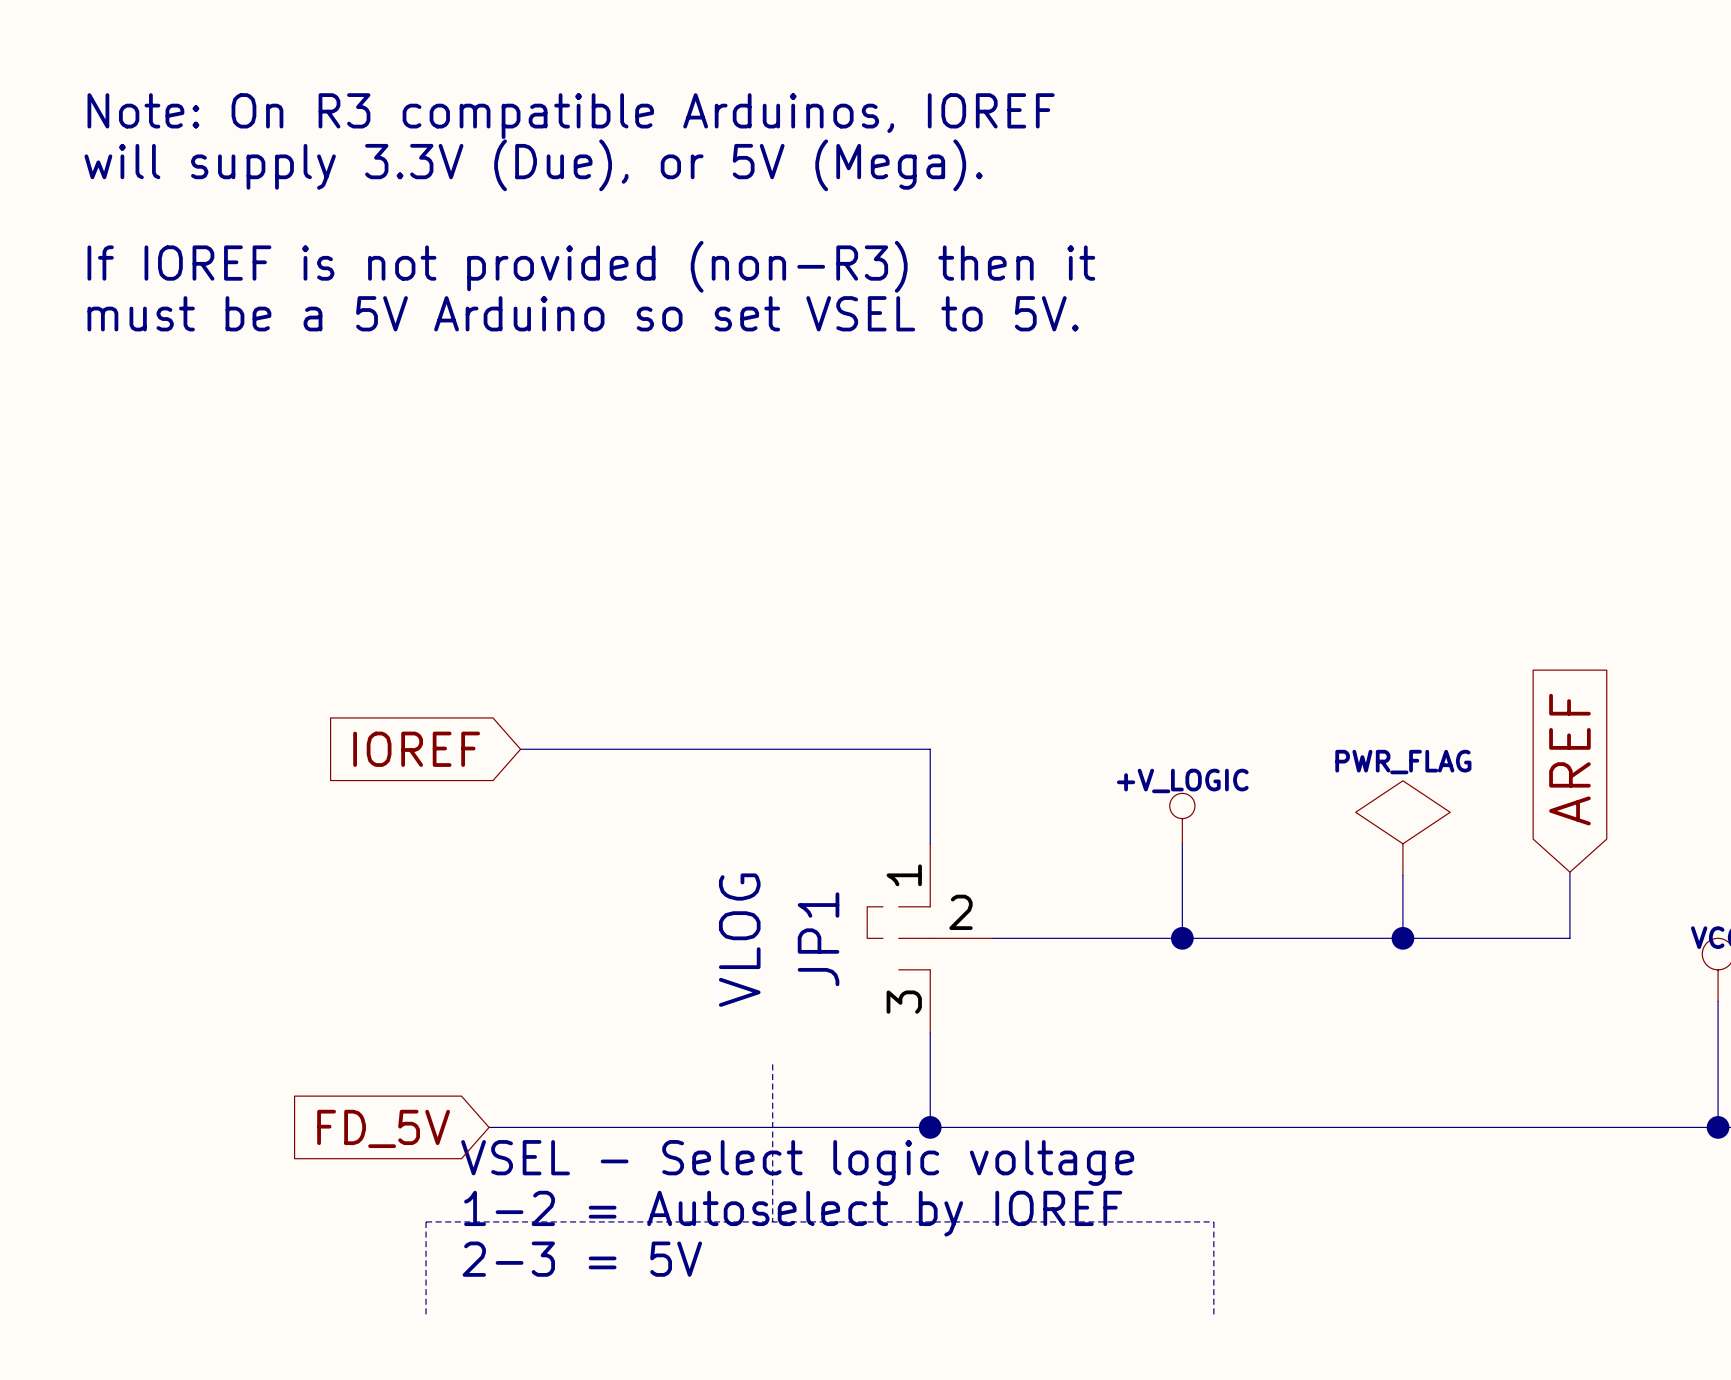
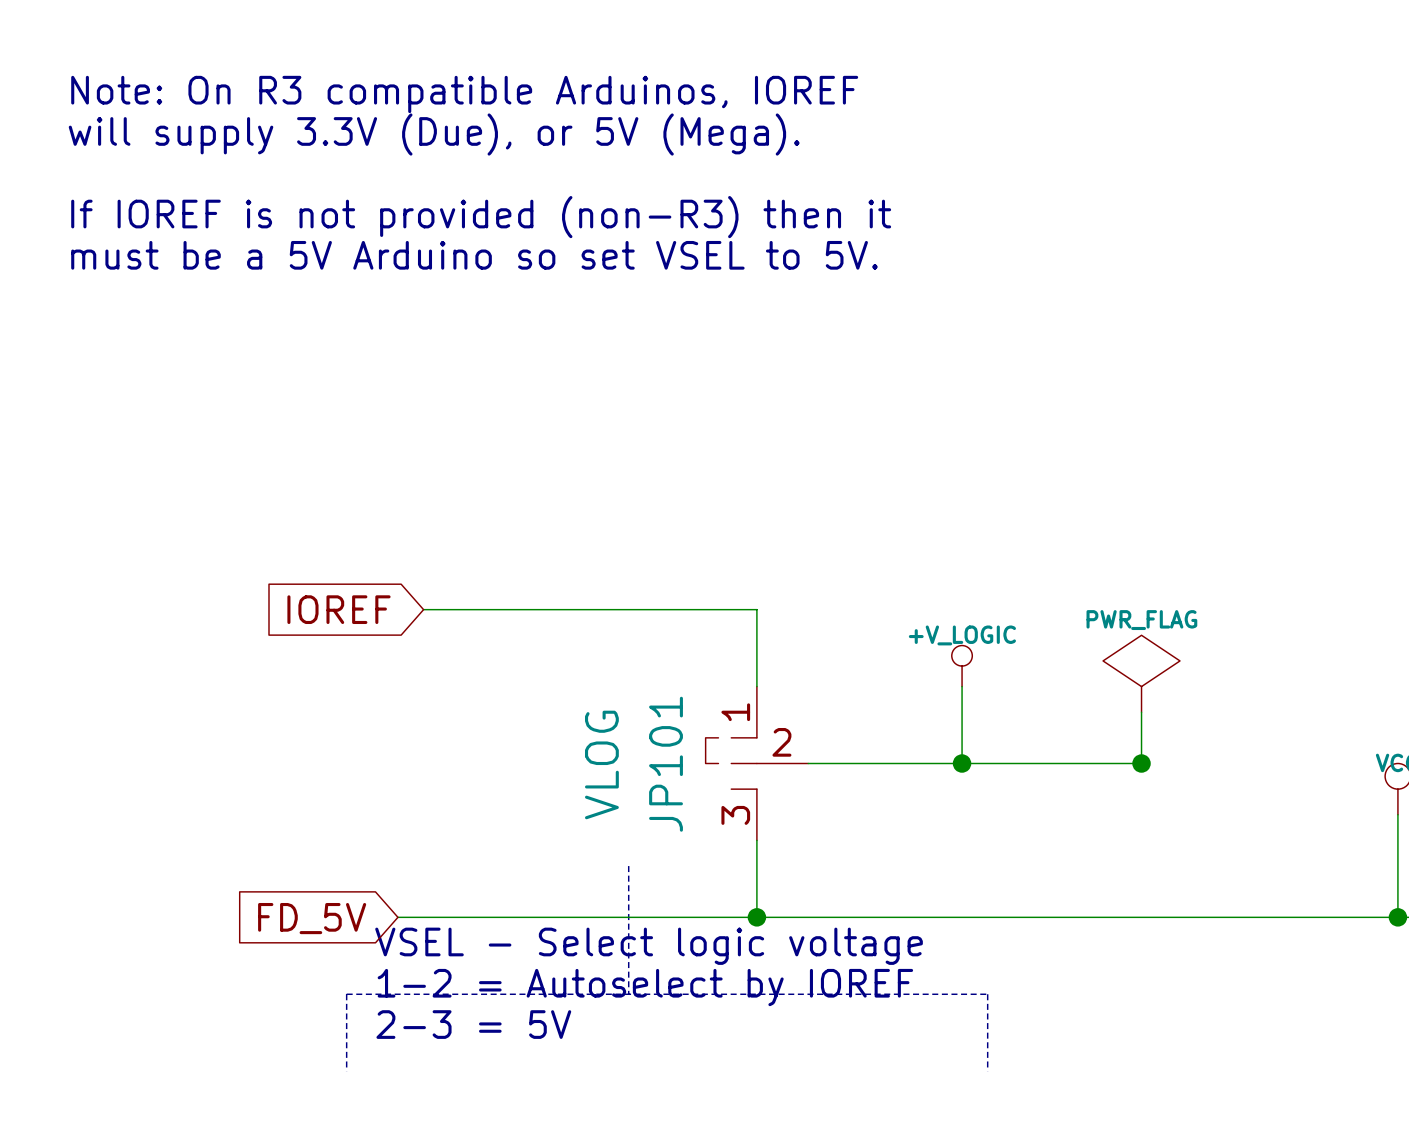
global label: AREF (1569, 759) -> none
wire: (1569, 872) (1569, 938) (1402, 938) -> none
JP1 name: JP1 (818, 939) -> JP101 (666, 764)

